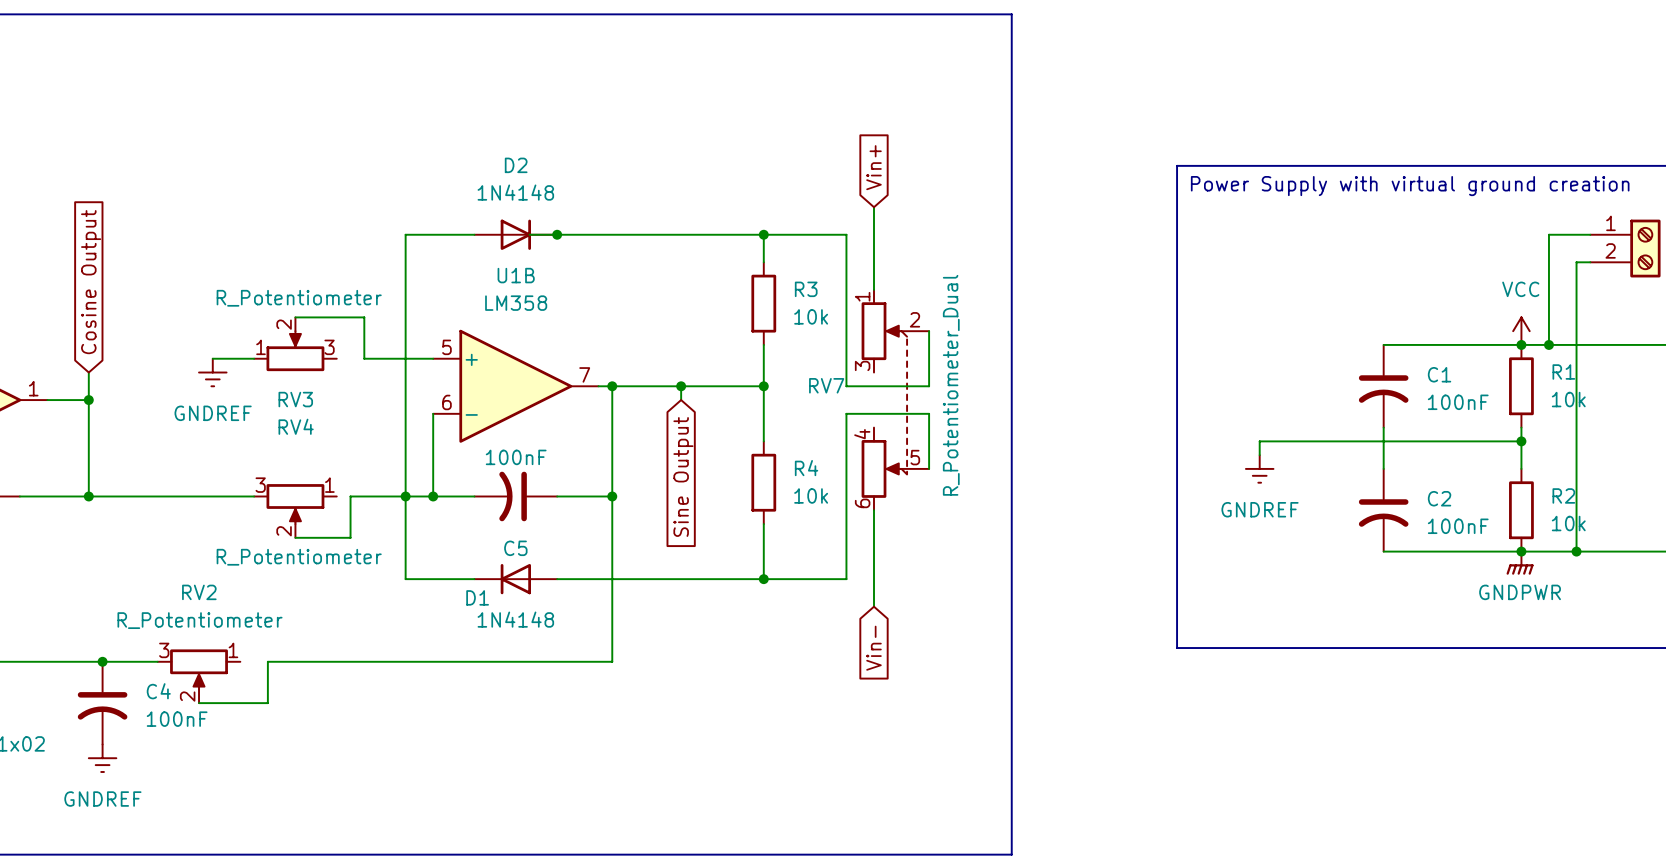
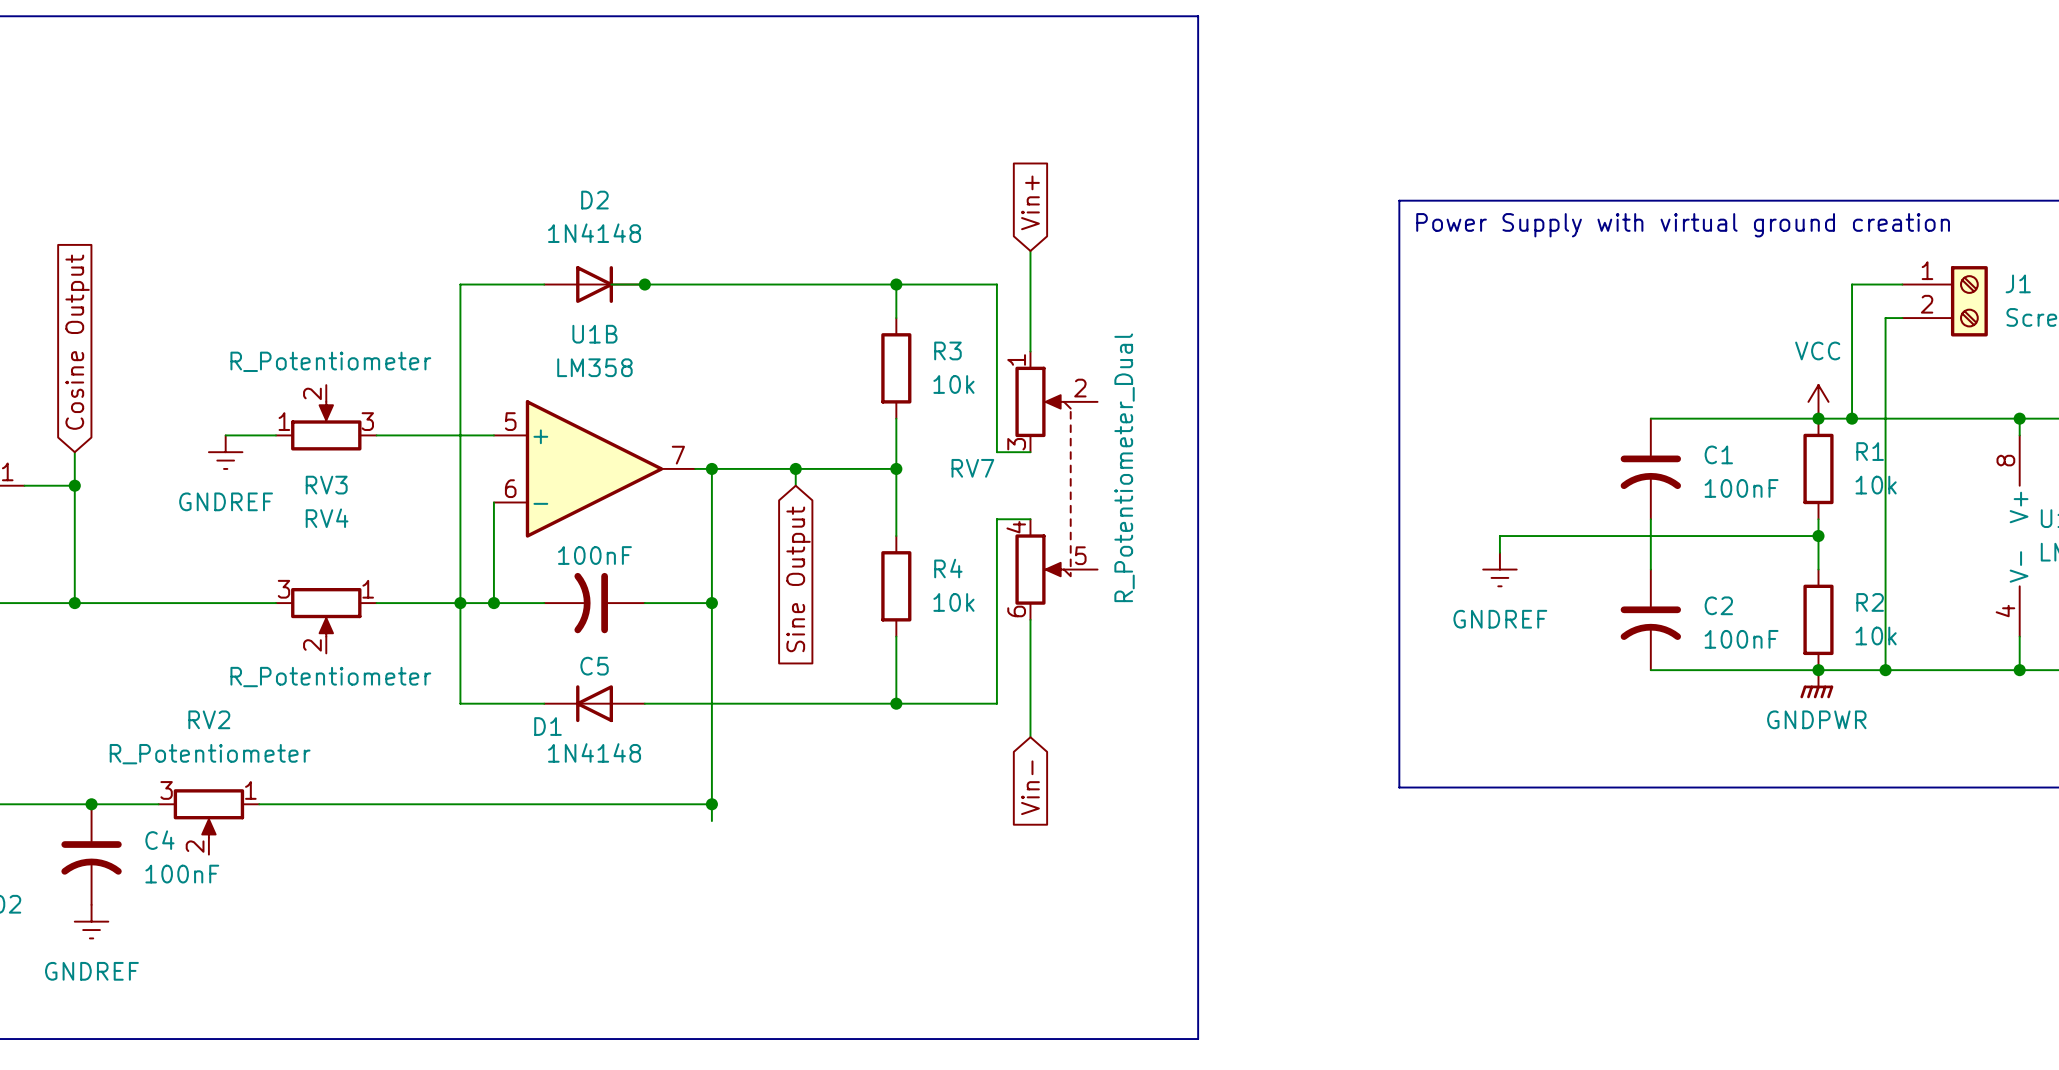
wire: (295, 317) (364, 317) (364, 358) -> (376, 435) (410, 435)
wire: (929, 331) (929, 386) (846, 386) (846, 372) -> (1030, 452) (996, 452)
wire: (846, 427) (846, 413) (929, 413) (929, 468) -> (996, 519) (1030, 519)
wire: (350, 496) (350, 537) (295, 537) -> (393, 603) (376, 603)
wire: (267, 661) (267, 703) (199, 703) -> (292, 804) (259, 804)
wire: none -> (711, 804) (711, 821)
junction: none -> (711, 804)

